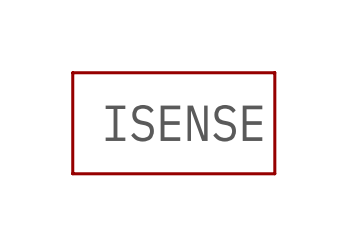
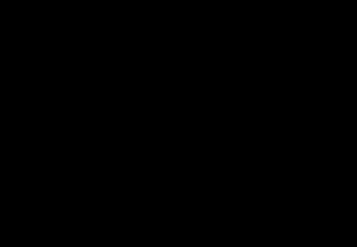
line: (72, 72) (274, 72) (274, 173) (72, 173) (72, 72) -> none
text: ISENSE (183, 123) -> none

